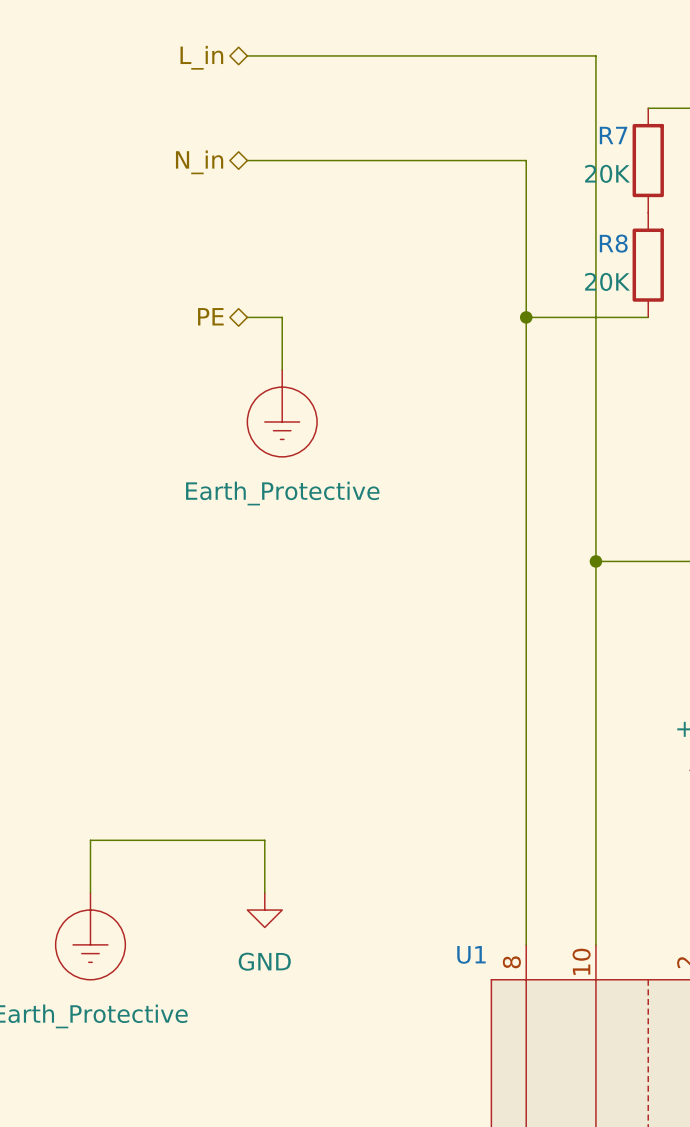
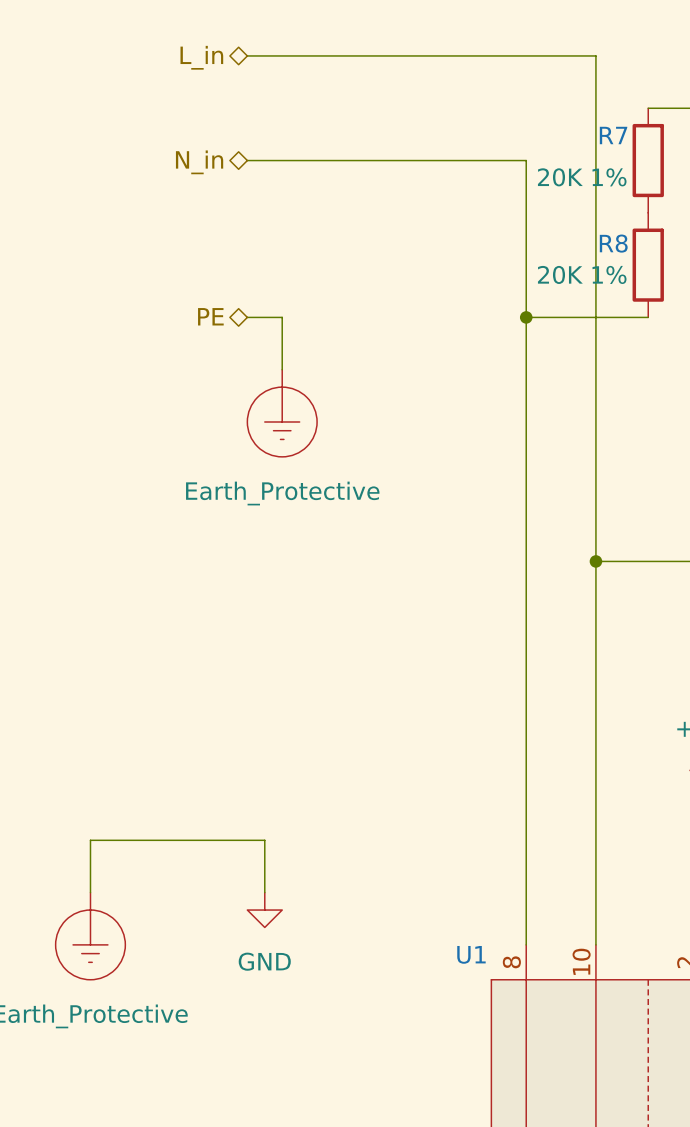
R7 value: 20K (607, 173) -> 20K 1% (582, 177)
R8 value: 20K (607, 281) -> 20K 1% (582, 274)

